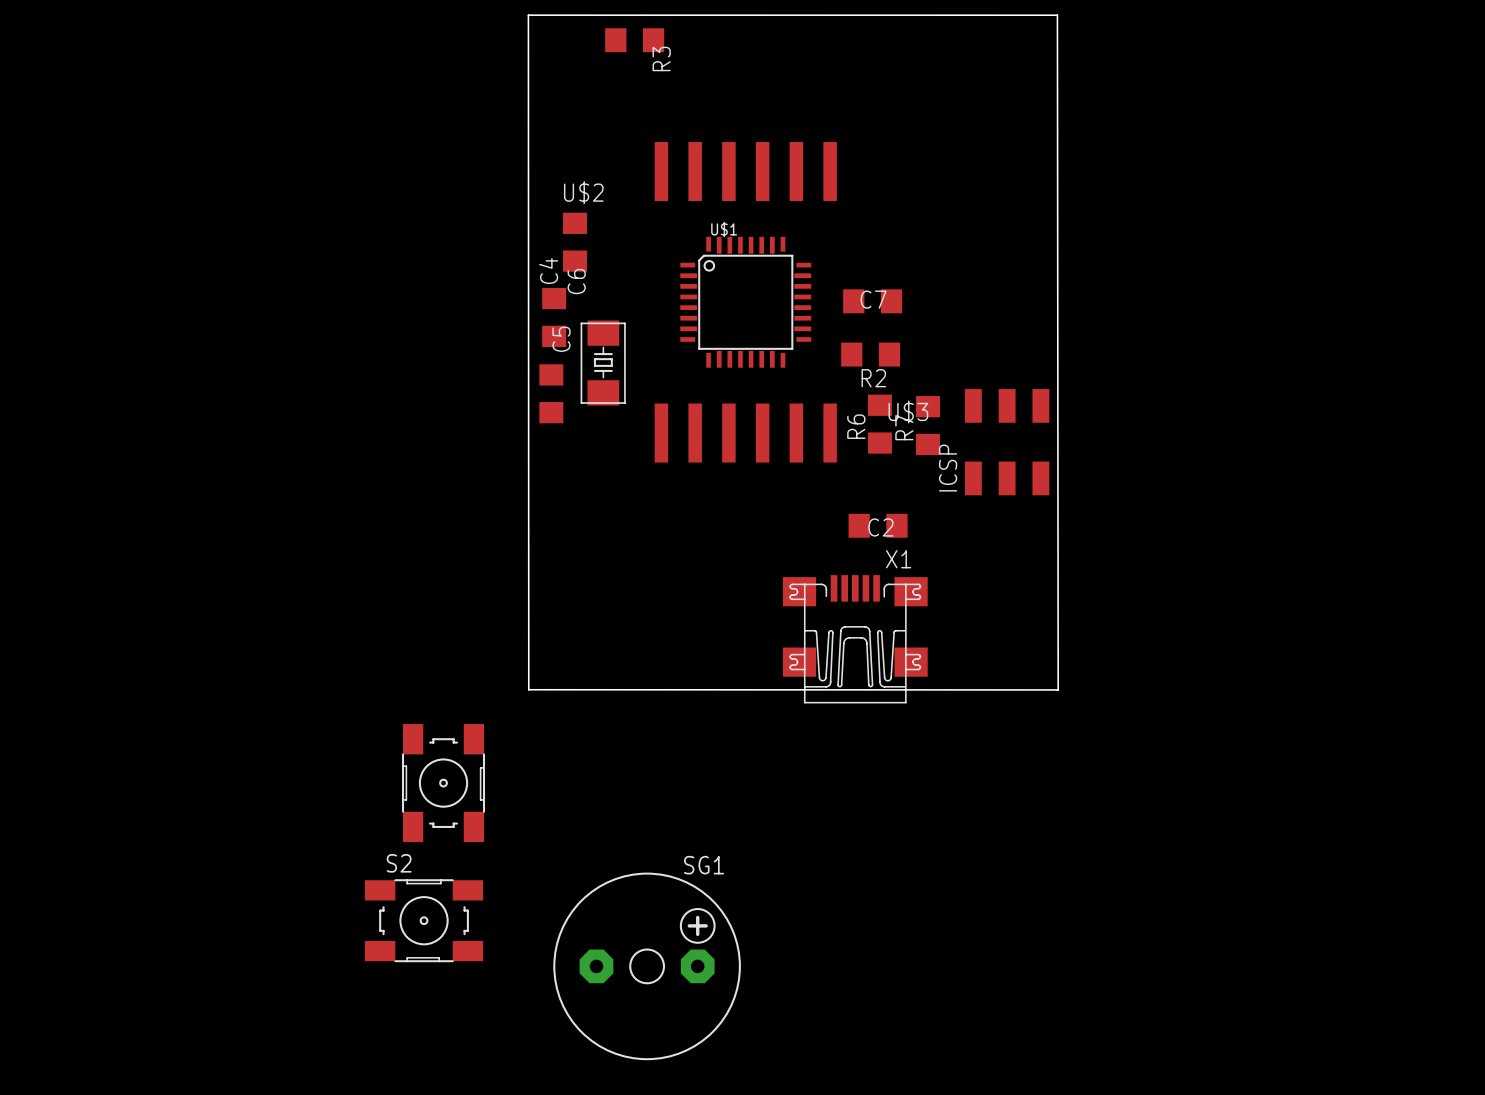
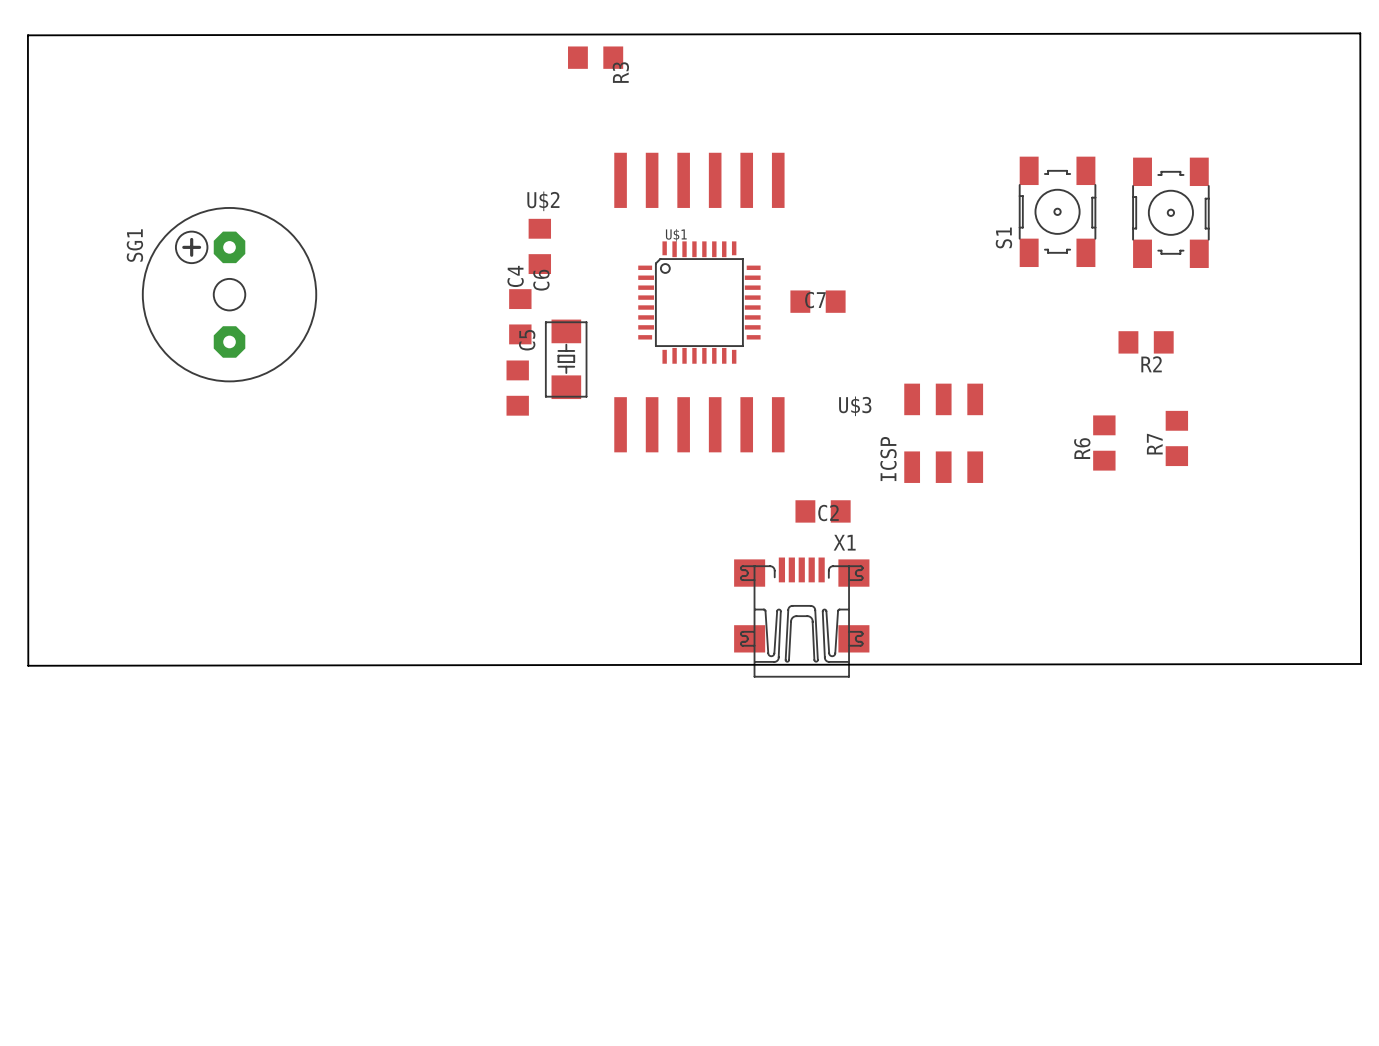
board edge: none -> (1360, 33) (1361, 664) (28, 665) (27, 35) (1360, 33)
board edge: (528, 15) (1057, 15) (1058, 689) (528, 689) (528, 15) -> none
S1: none -> (1057, 211)
part: none -> (1170, 212)
R2 position: (870, 354) -> (1146, 342)
R6 position: (879, 424) -> (1104, 443)
R7 position: (928, 425) -> (1176, 438)
part: (443, 783) -> none
S2: (424, 920) -> none
SG1 rotation: 0° (647, 966) -> 90° counterclockwise (229, 294)
SG1 position: (647, 966) -> (229, 294)

